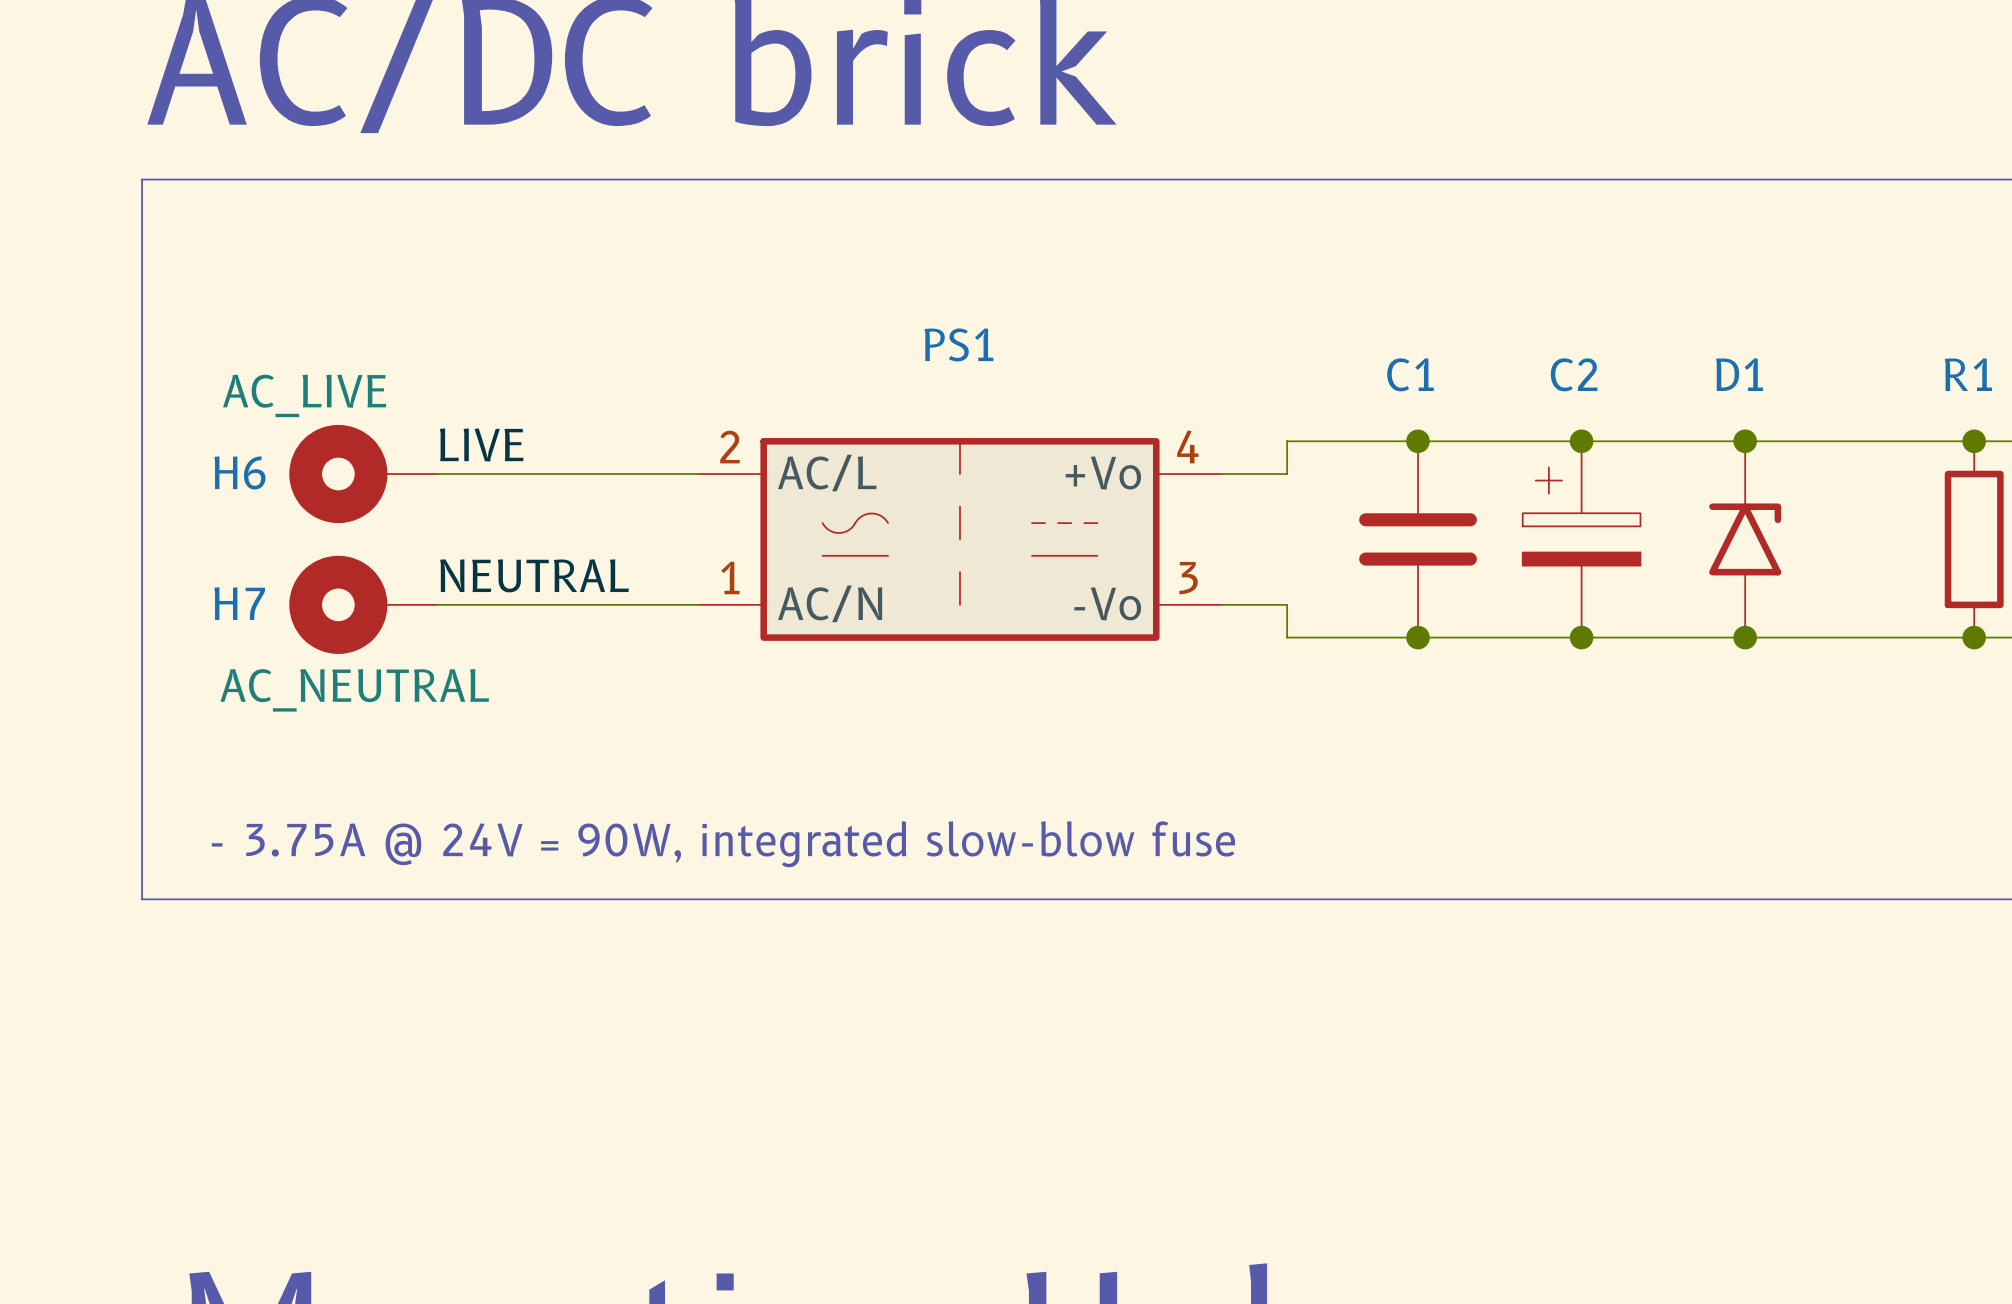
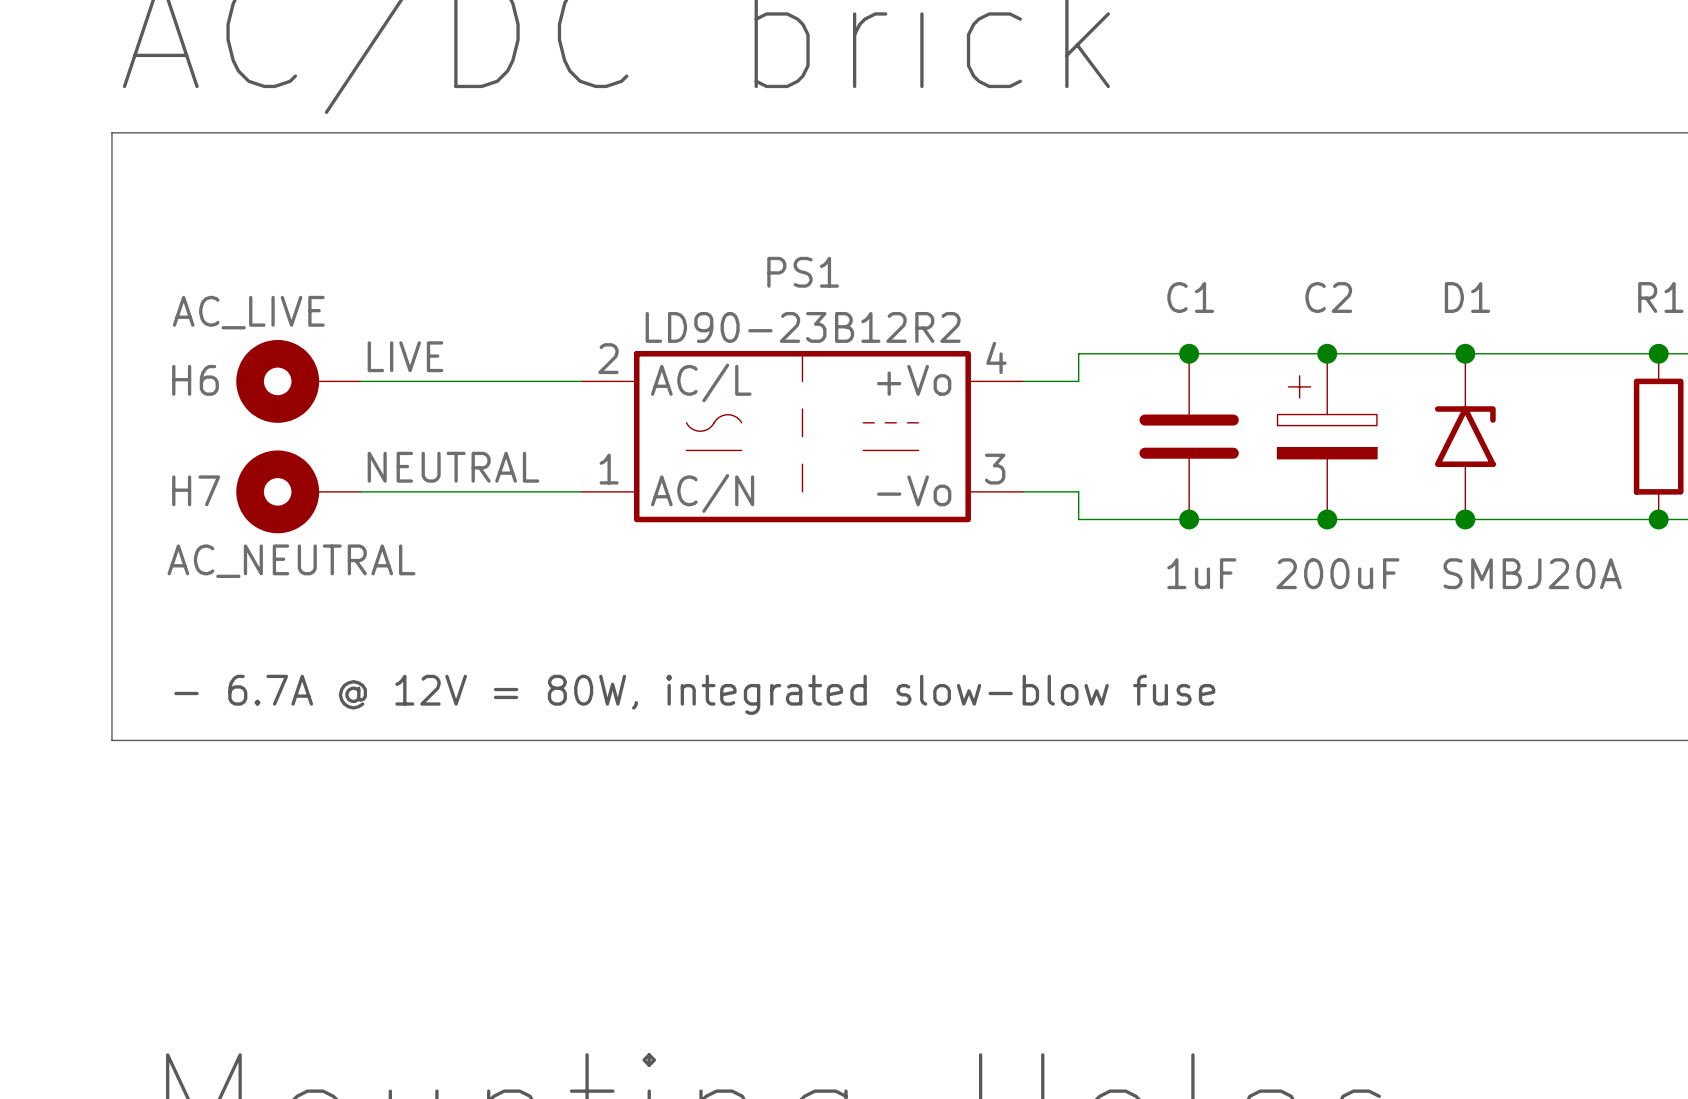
PS1 value: none -> LD90-23B12R2 (803, 327)
C1 value: none -> 1uF (1201, 573)
D1 value: none -> SMBJ20A (1532, 573)
C2 value: none -> 200uF (1337, 573)
text: - 3.75A @ 24V = 90W, integrated slow-blow fuse (723, 844) -> - 6.7A @ 12V = 80W, integrated slow-blow fuse (694, 694)

